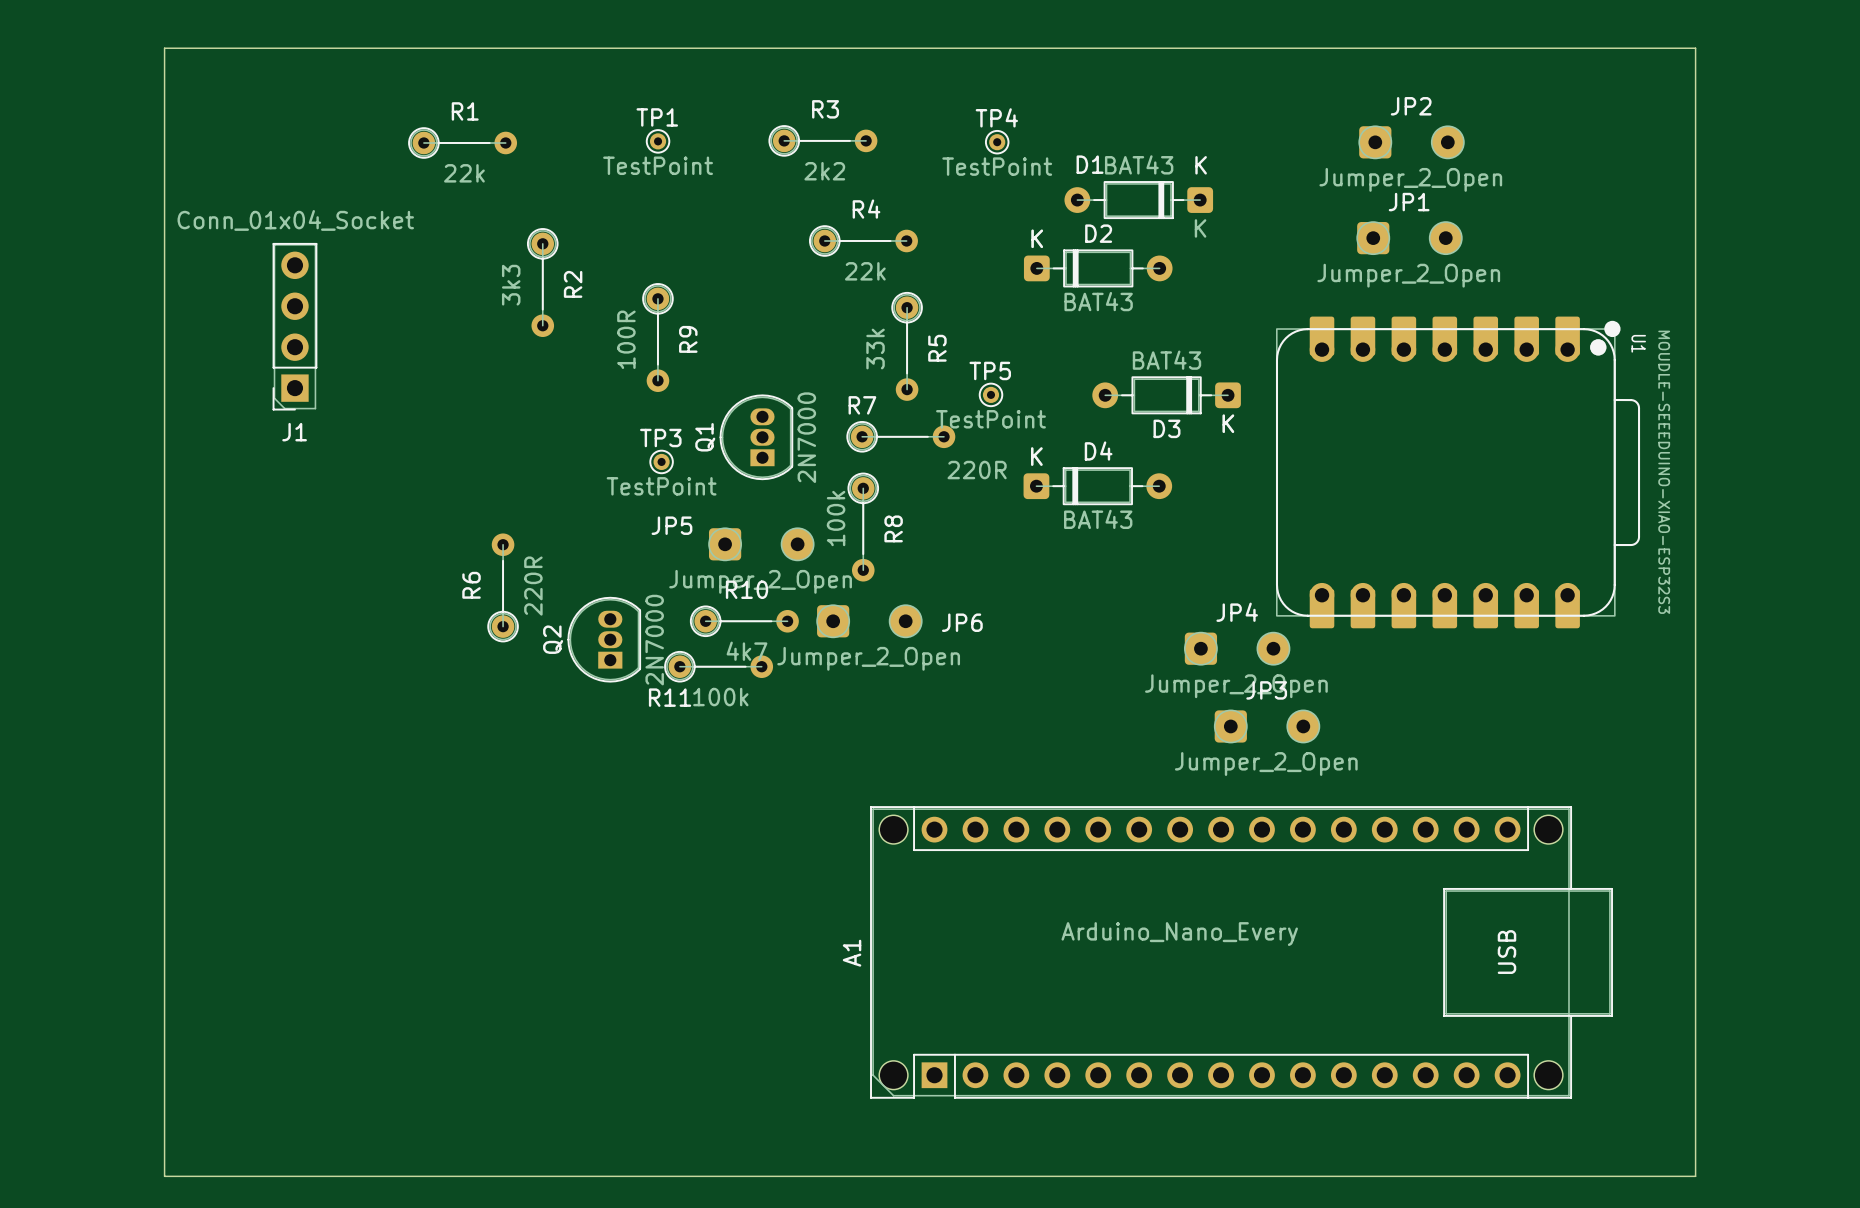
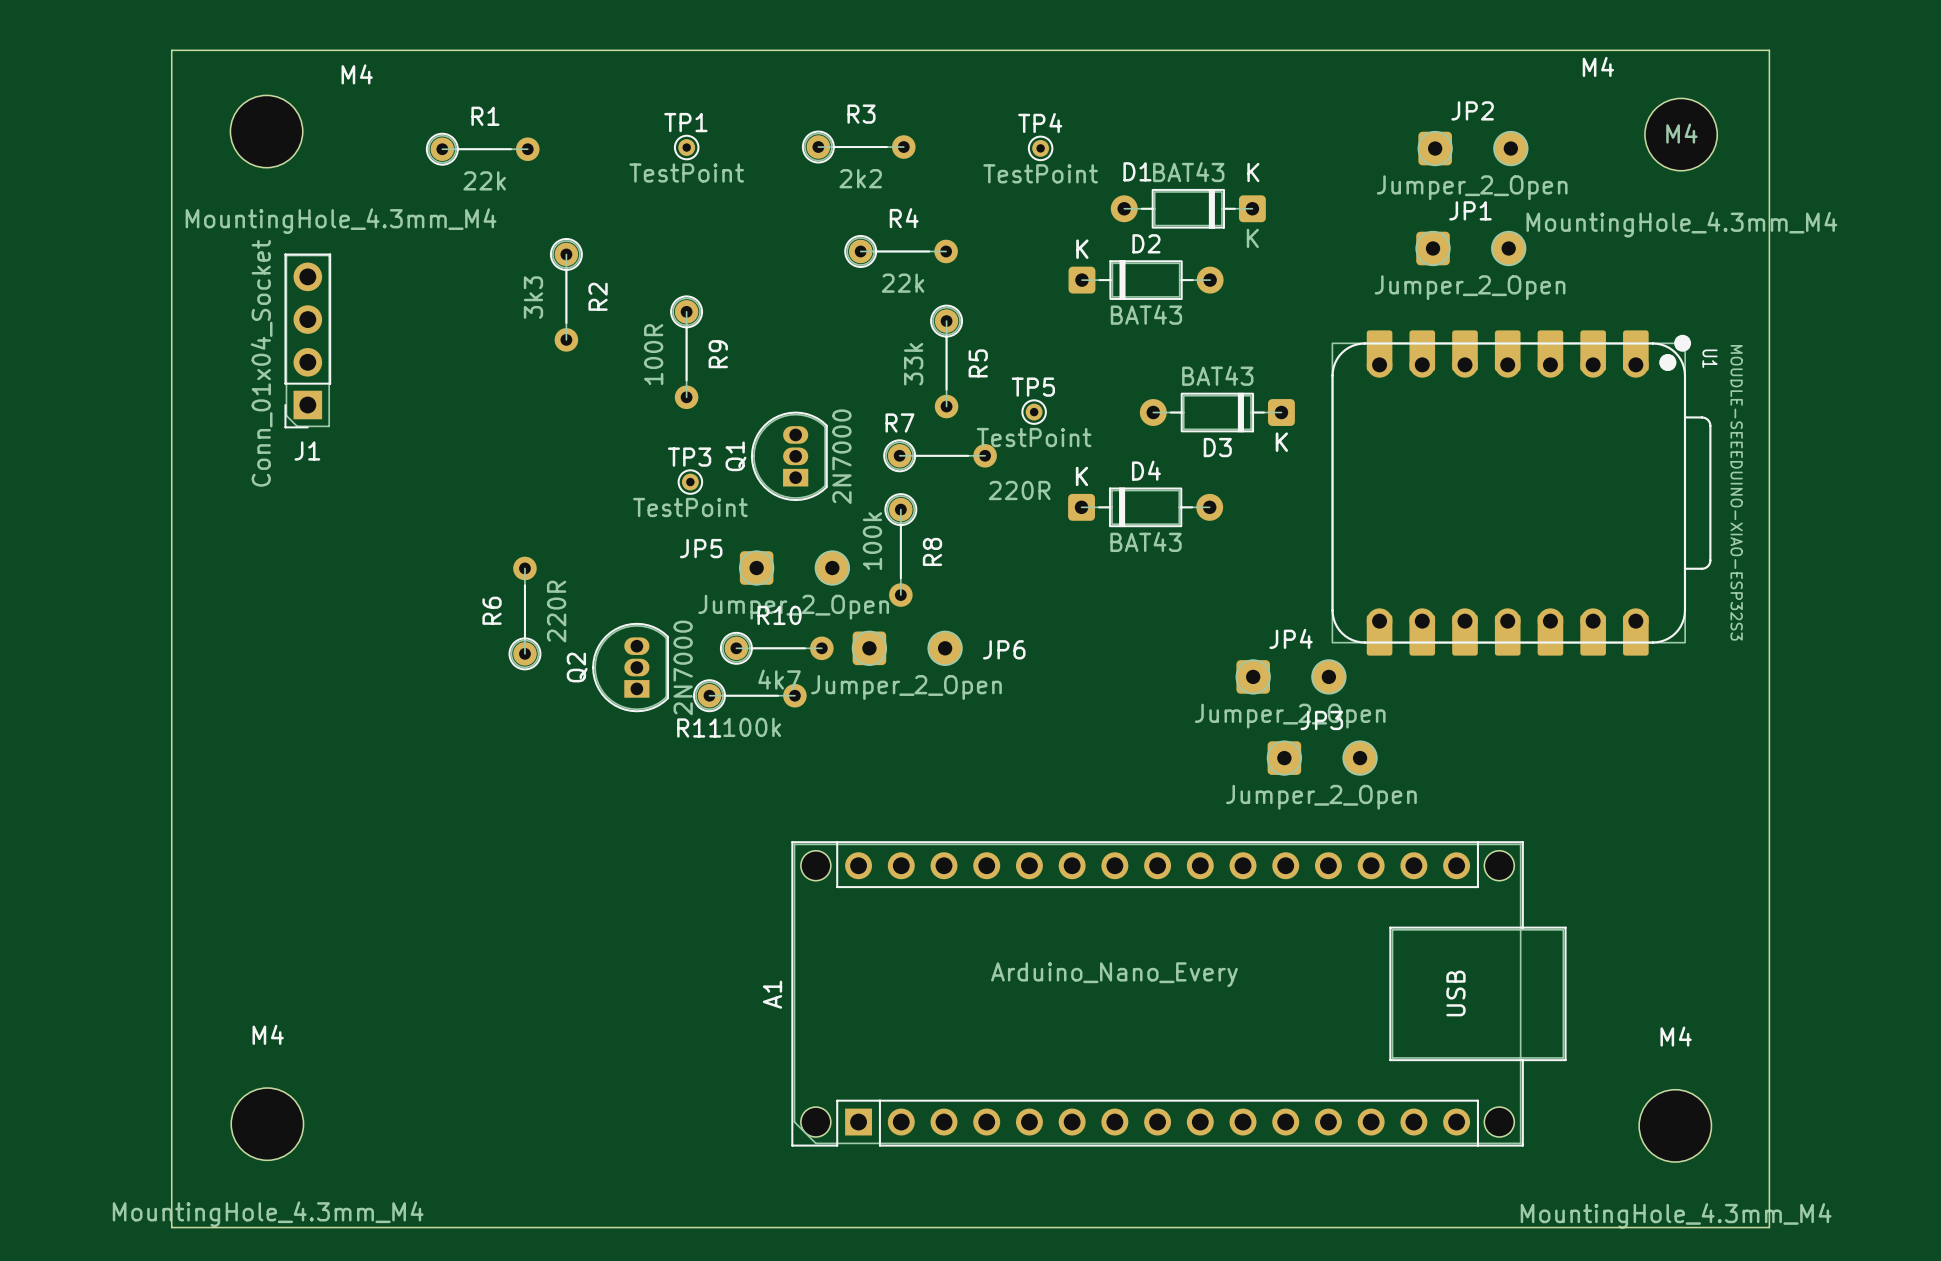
M4: none -> MountingHole_4.3mm_M4 (266, 131)
M4: none -> MountingHole_4.3mm_M4 (1681, 134)
J1 value rotation: 0° (295, 220) -> 90° counterclockwise (261, 363)
A1 position: (1241, 952) -> (1178, 993)
M4: none -> MountingHole_4.3mm_M4 (267, 1124)
M4: none -> MountingHole_4.3mm_M4 (1675, 1125)

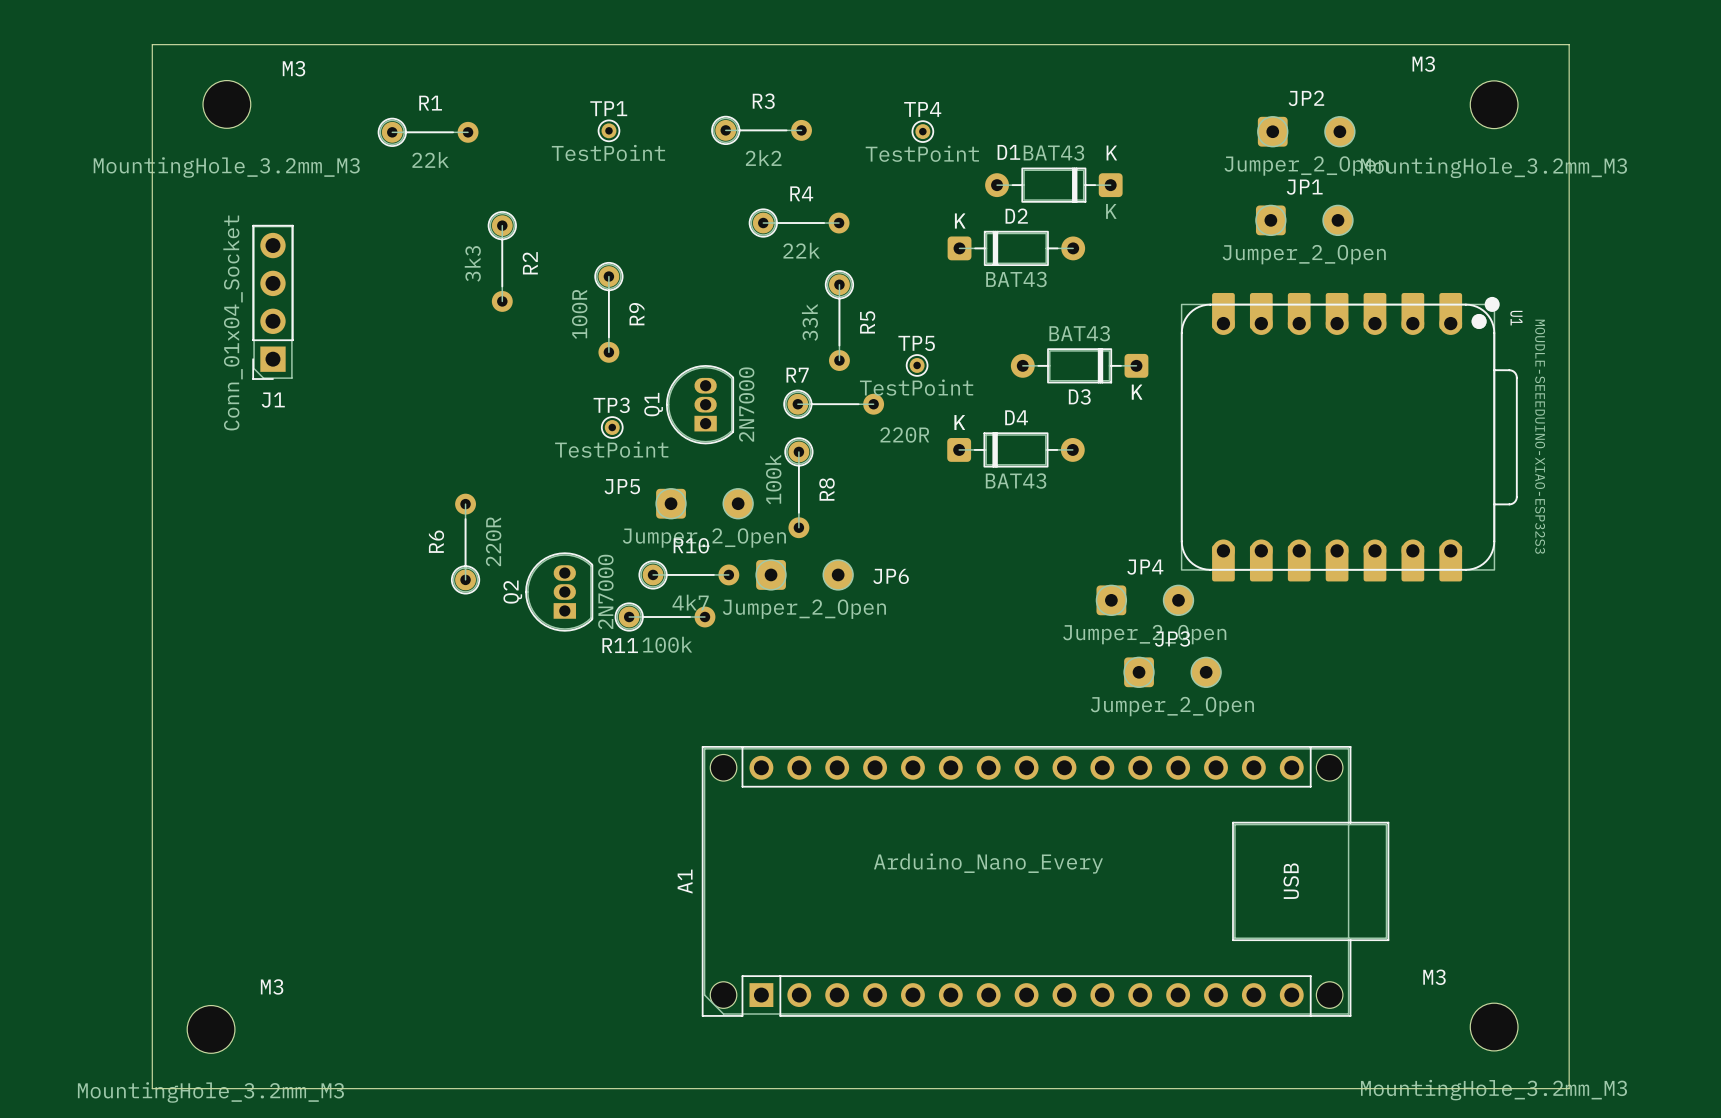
M3: none -> MountingHole_3.2mm_M3 (226, 104)
M3: none -> MountingHole_3.2mm_M3 (1494, 104)
M4: MountingHole_4.3mm_M4 (266, 131) -> none
M4: MountingHole_4.3mm_M4 (1681, 134) -> none
M4: MountingHole_4.3mm_M4 (267, 1124) -> none
M4: MountingHole_4.3mm_M4 (1675, 1125) -> none
M3: none -> MountingHole_3.2mm_M3 (1494, 1027)
M3: none -> MountingHole_3.2mm_M3 (211, 1029)

